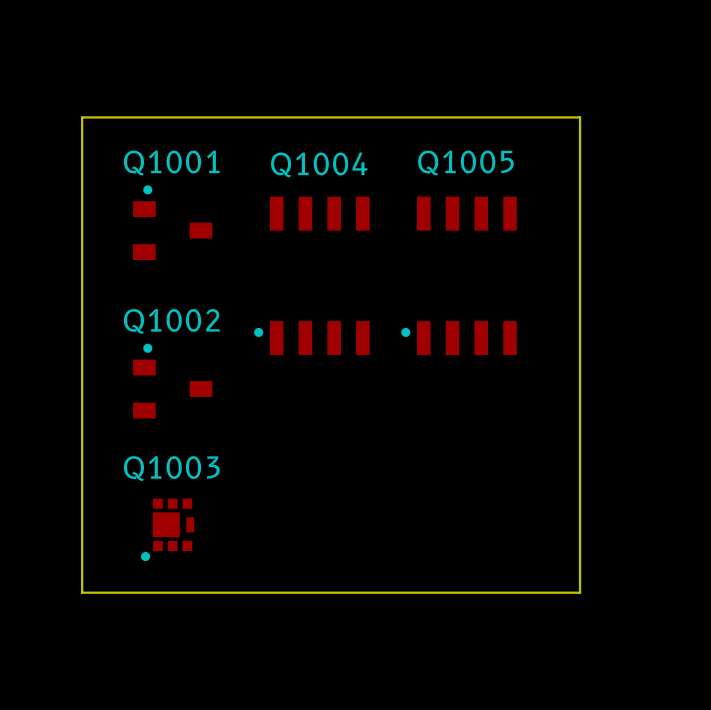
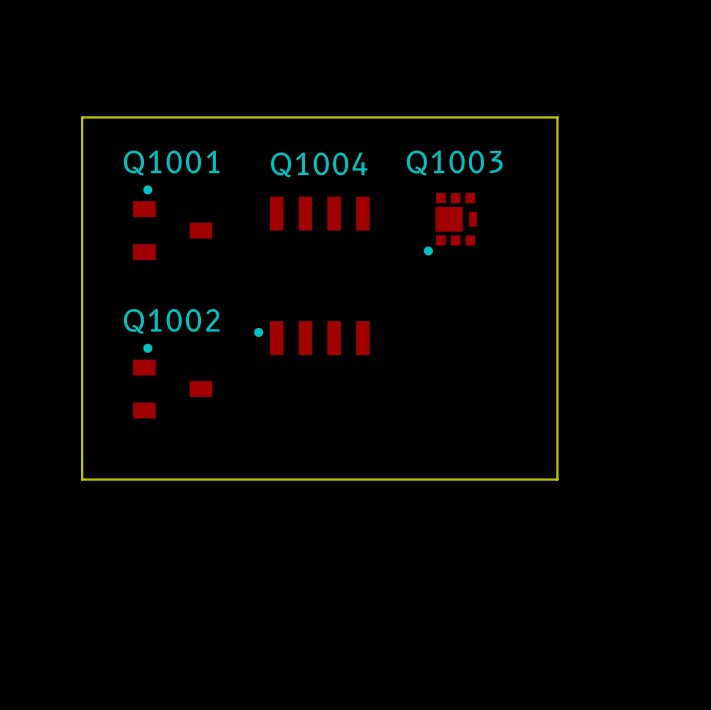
board edge: (557, 117) (580, 117) (580, 592) (82, 592) (82, 479) -> (557, 117) (557, 479) (82, 479)
Q1005: (459, 275) -> none
Q1003 position: (167, 529) -> (450, 224)

